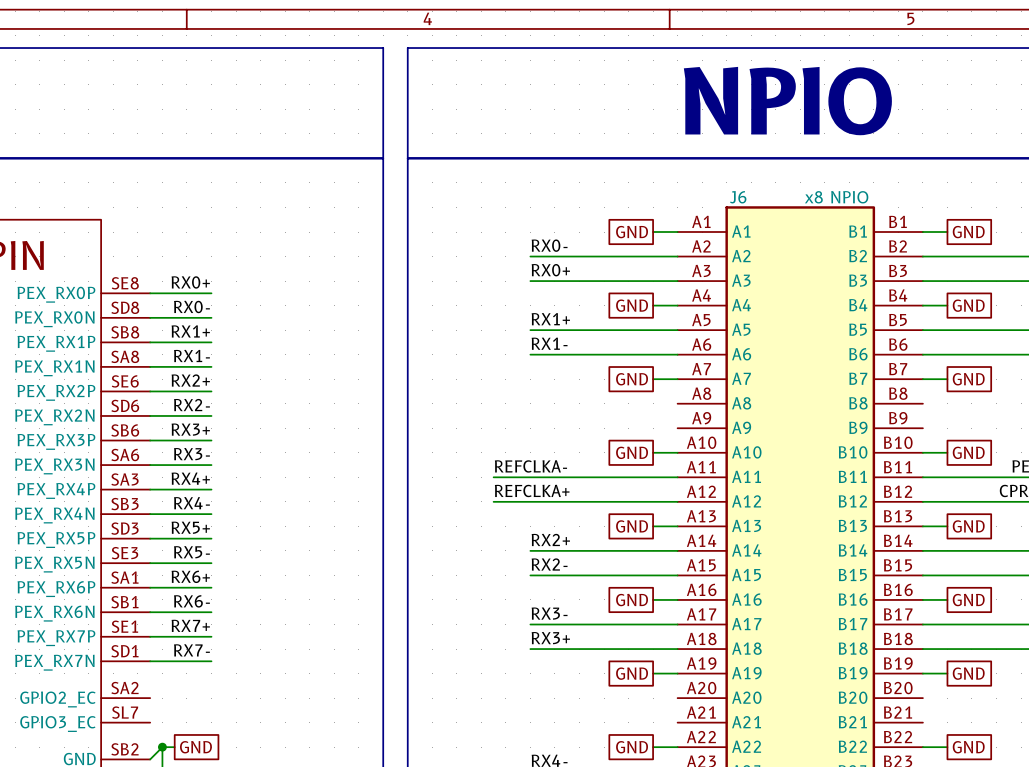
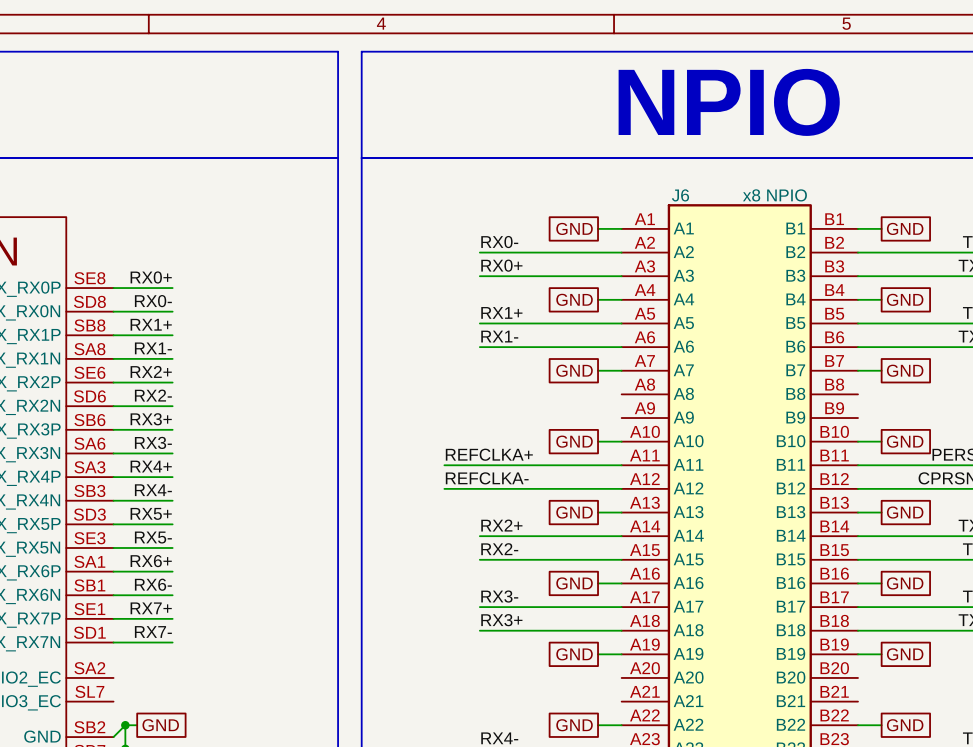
label: REFCLKA- (530, 466) -> REFCLKA+ (489, 454)
label: REFCLKA+ (532, 490) -> REFCLKA- (487, 478)

